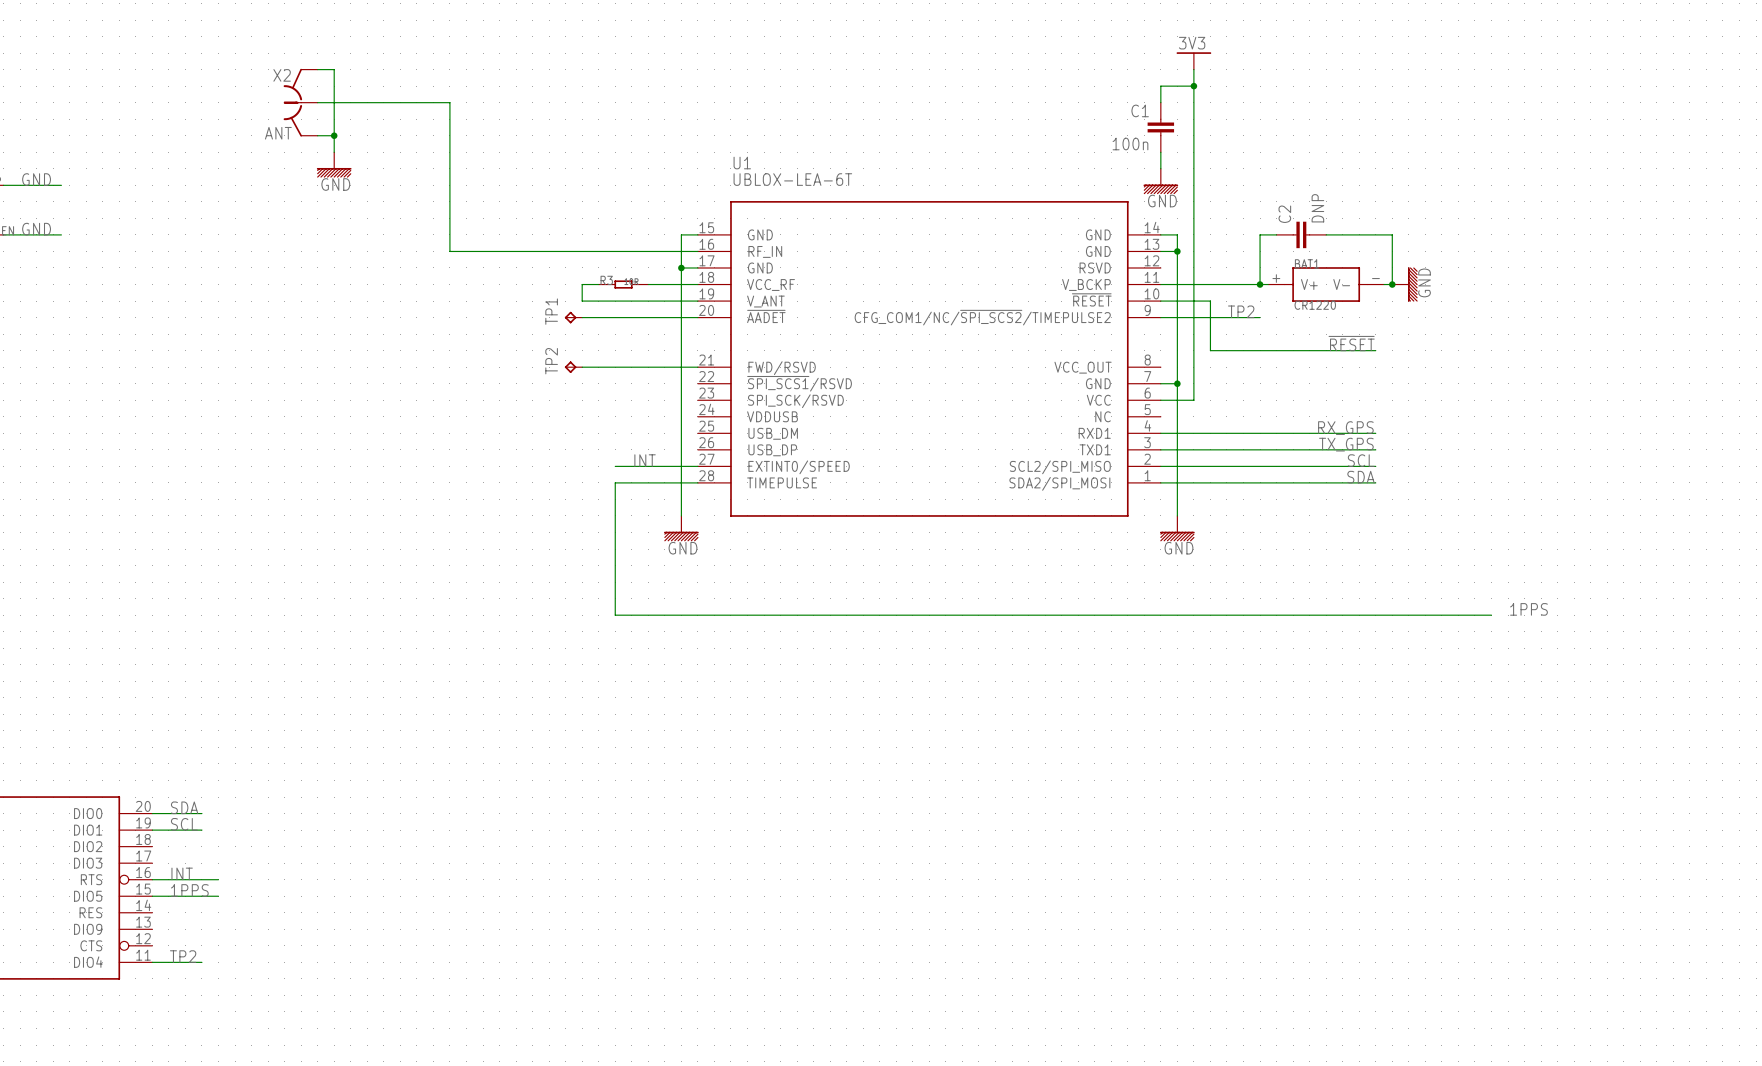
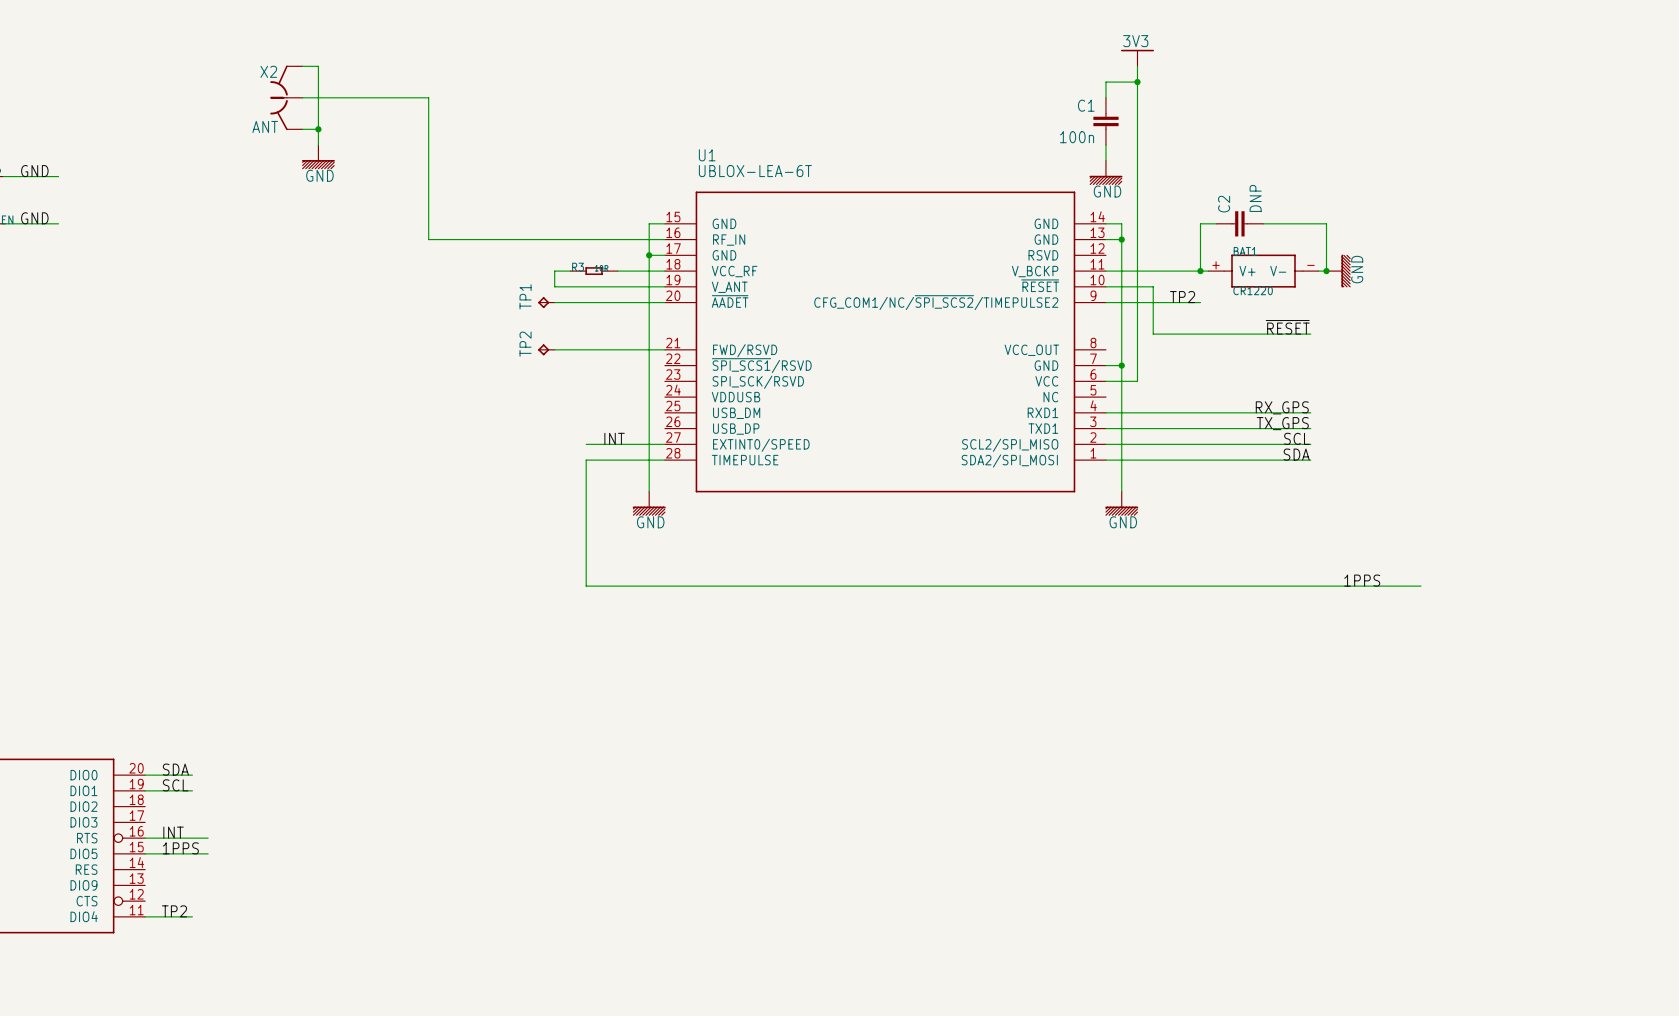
label position: 1PPS (1528, 609) -> 1PPS (1362, 580)

